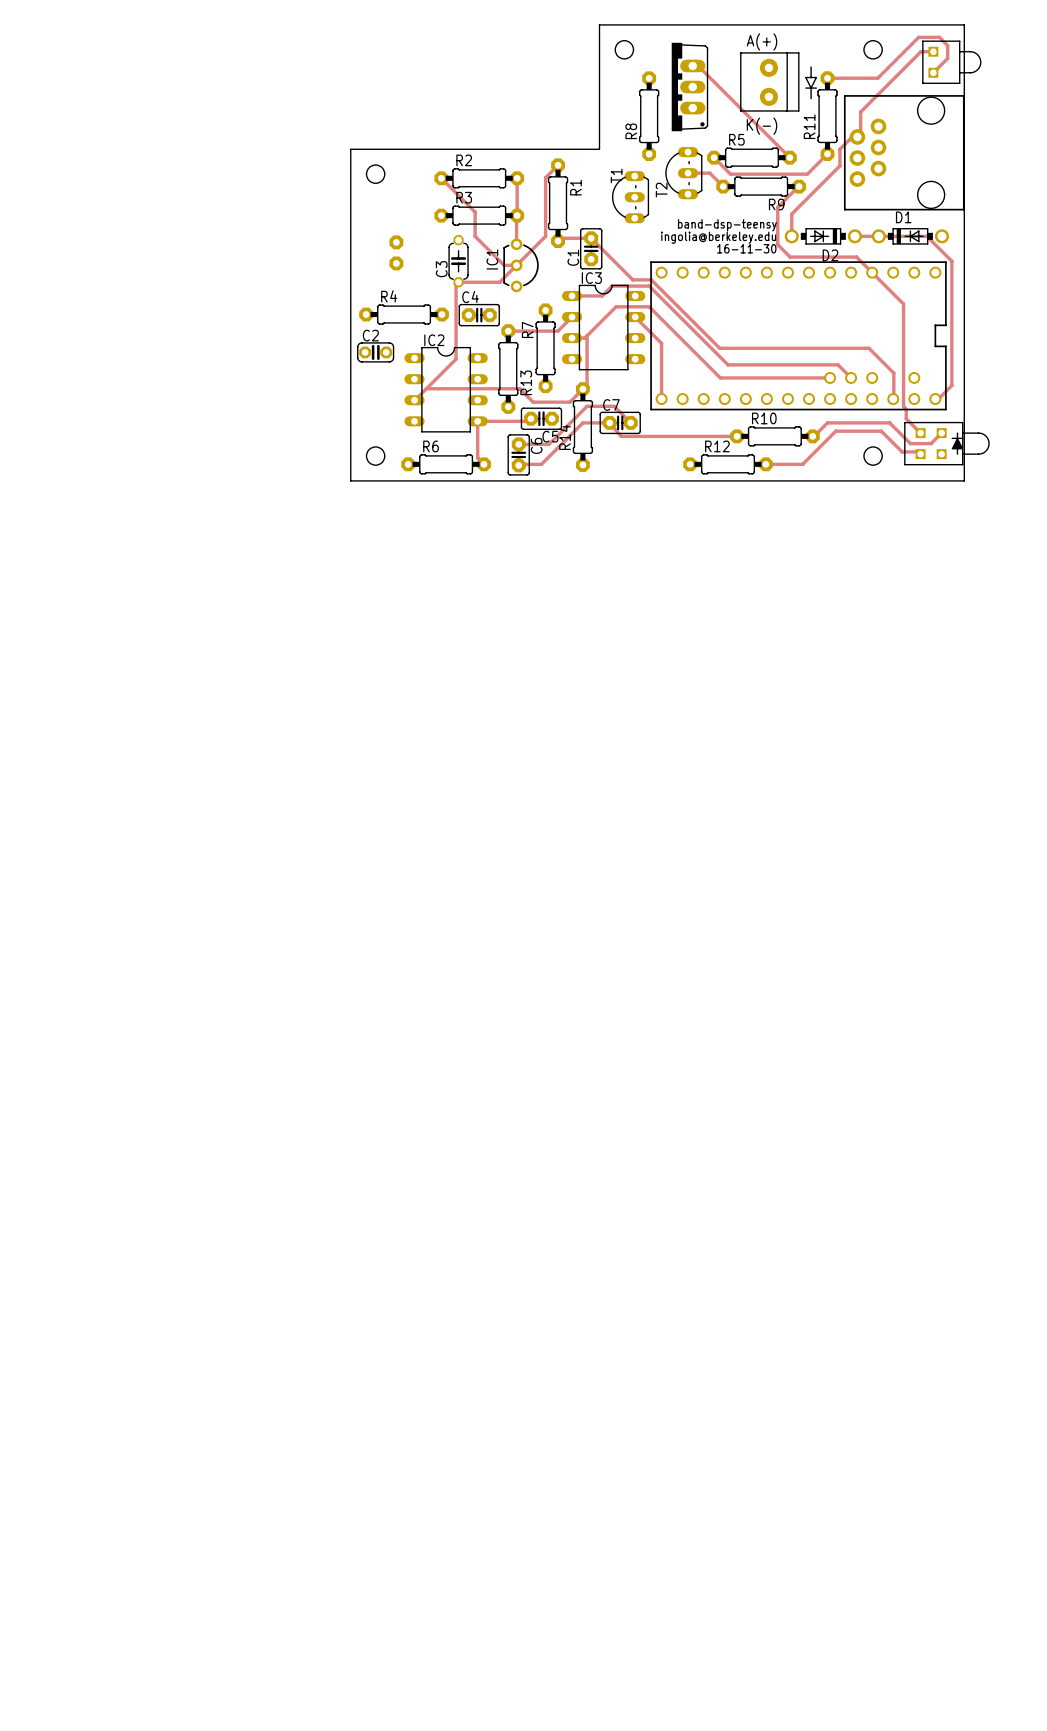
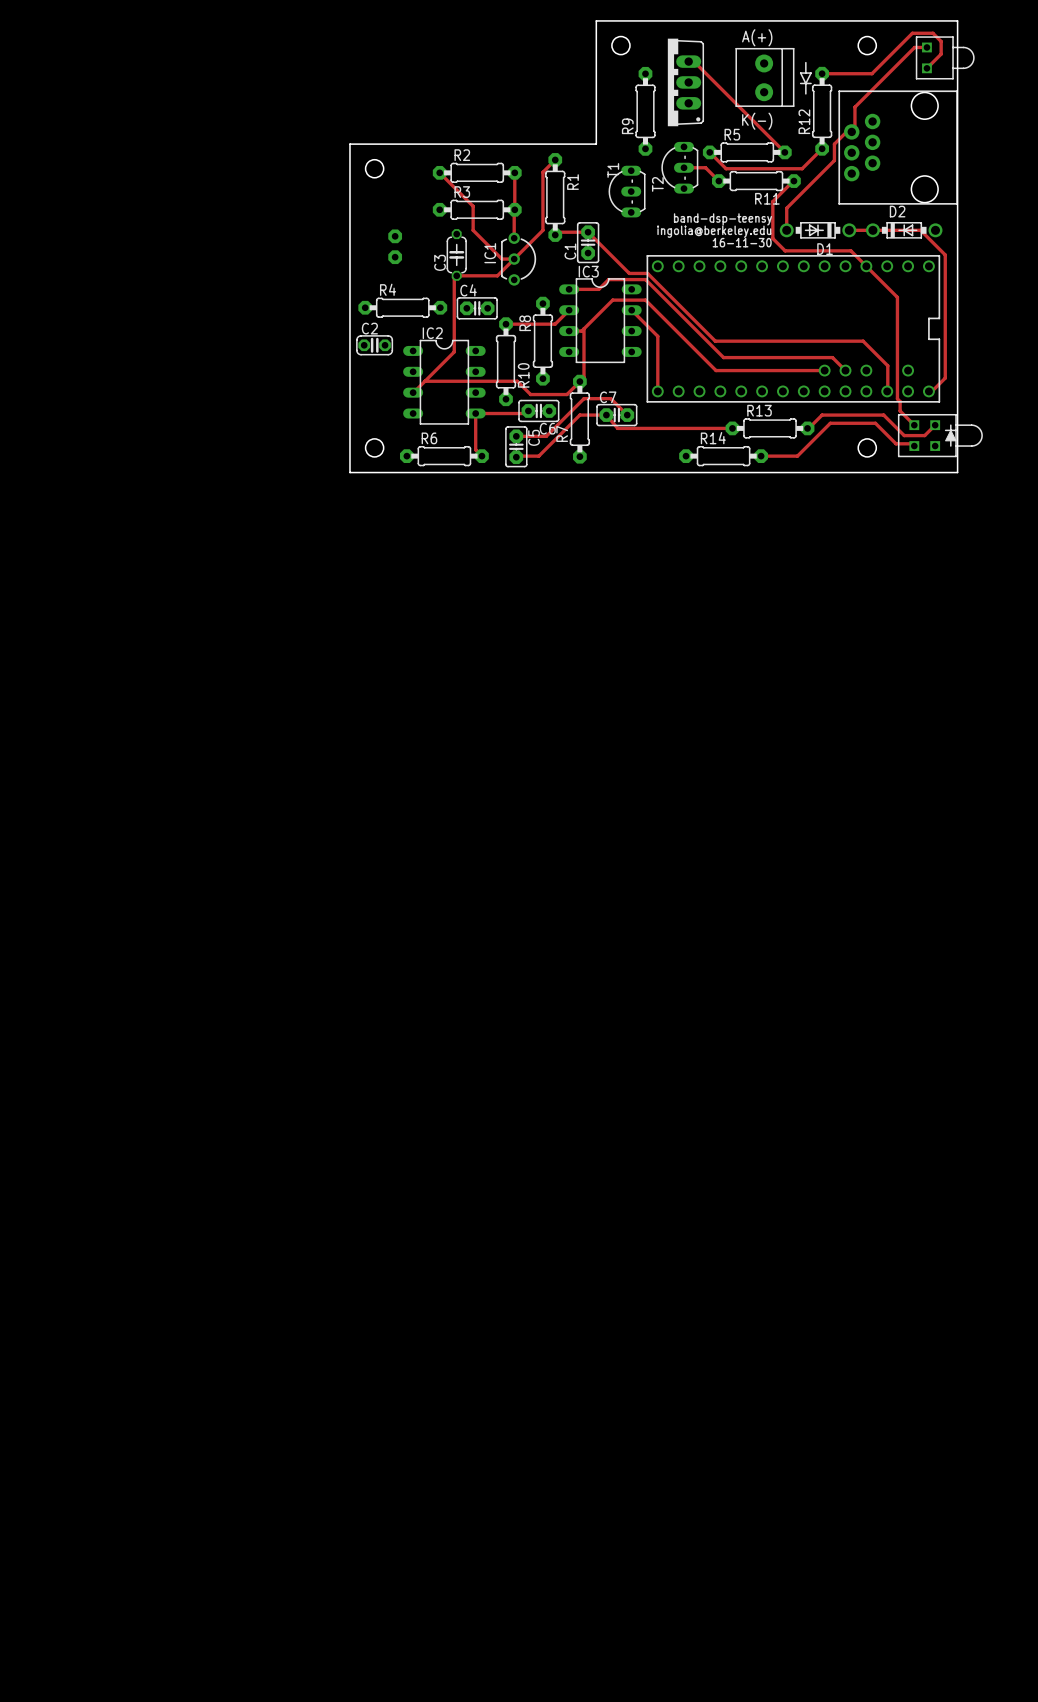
R11 name: R11 (809, 126) -> R12 (804, 121)
R8 name: R8 (631, 131) -> R9 (627, 126)
R9 name: R9 (776, 204) -> R11 (767, 198)
D1 name: D1 (903, 217) -> D2 (897, 211)
D2 name: D2 (830, 255) -> D1 (825, 249)
R7 name: R7 (527, 329) -> R8 (525, 323)
R13 name: R13 (526, 382) -> R10 (523, 375)
R10 name: R10 (764, 418) -> R13 (759, 410)
C5 name: C5 (550, 436) -> C6 (547, 428)
R14 name: R14 (564, 437) -> R7 (562, 433)
C6 name: C6 (536, 445) -> C5 (534, 437)
R12 name: R12 (717, 446) -> R14 (713, 438)

